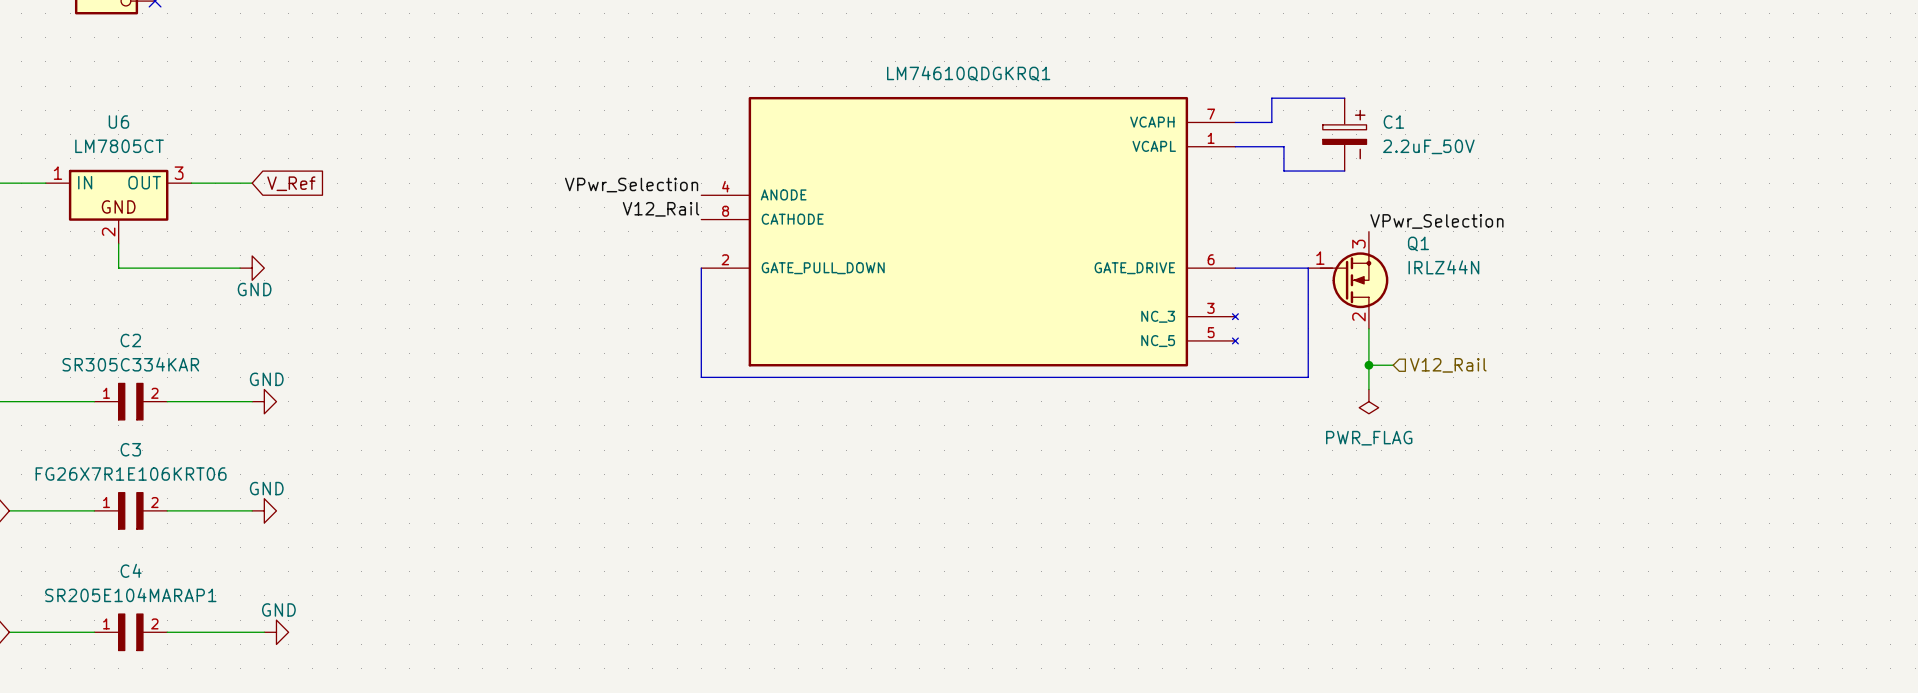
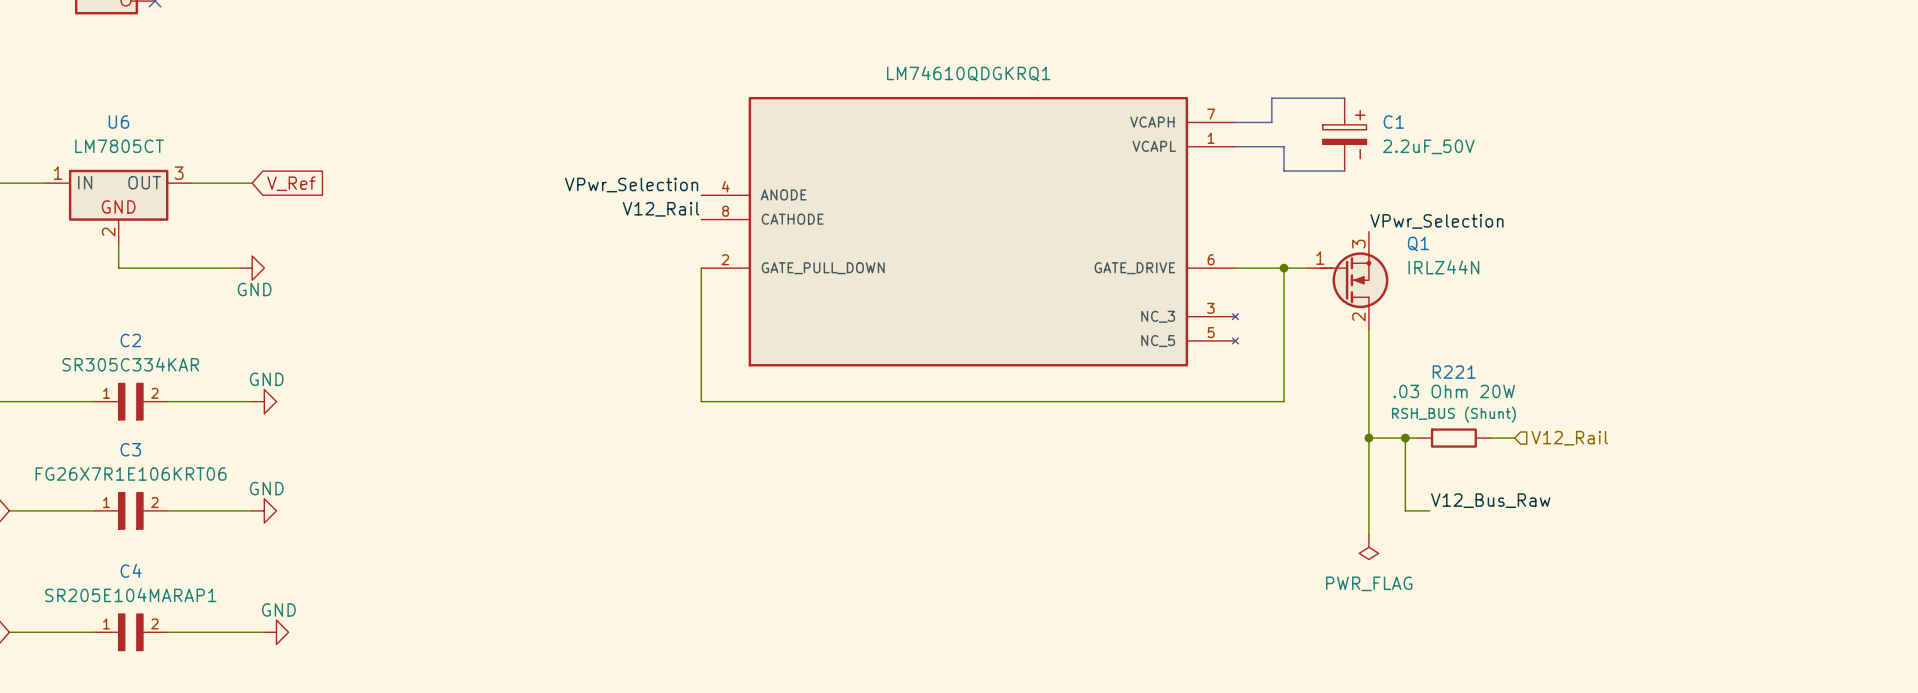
wire: none -> (701, 268) (701, 401) (1283, 401) (1283, 268)
bus: (701, 268) (701, 377) (1308, 377) (1308, 268) (1235, 268) -> none
junction: none -> (1283, 268)
wire: (1368, 365) (1393, 365) -> (1490, 438) (1514, 438)
junction: (1368, 365) -> none
hierarchical label position: V12_Rail (1448, 365) -> V12_Rail (1569, 438)
wire: none -> (1368, 389) (1368, 535)
power symbol position: PWR_FLAG (1368, 401) -> PWR_FLAG (1368, 547)
wire: none -> (1368, 438) (1417, 438)
junction: none -> (1368, 438)
wire: none -> (1405, 438) (1405, 510) (1429, 510)
junction: none -> (1405, 438)
R221: none -> .03 Ohm 20W (1453, 438)
label: none -> V12_Bus_Raw (1490, 500)

